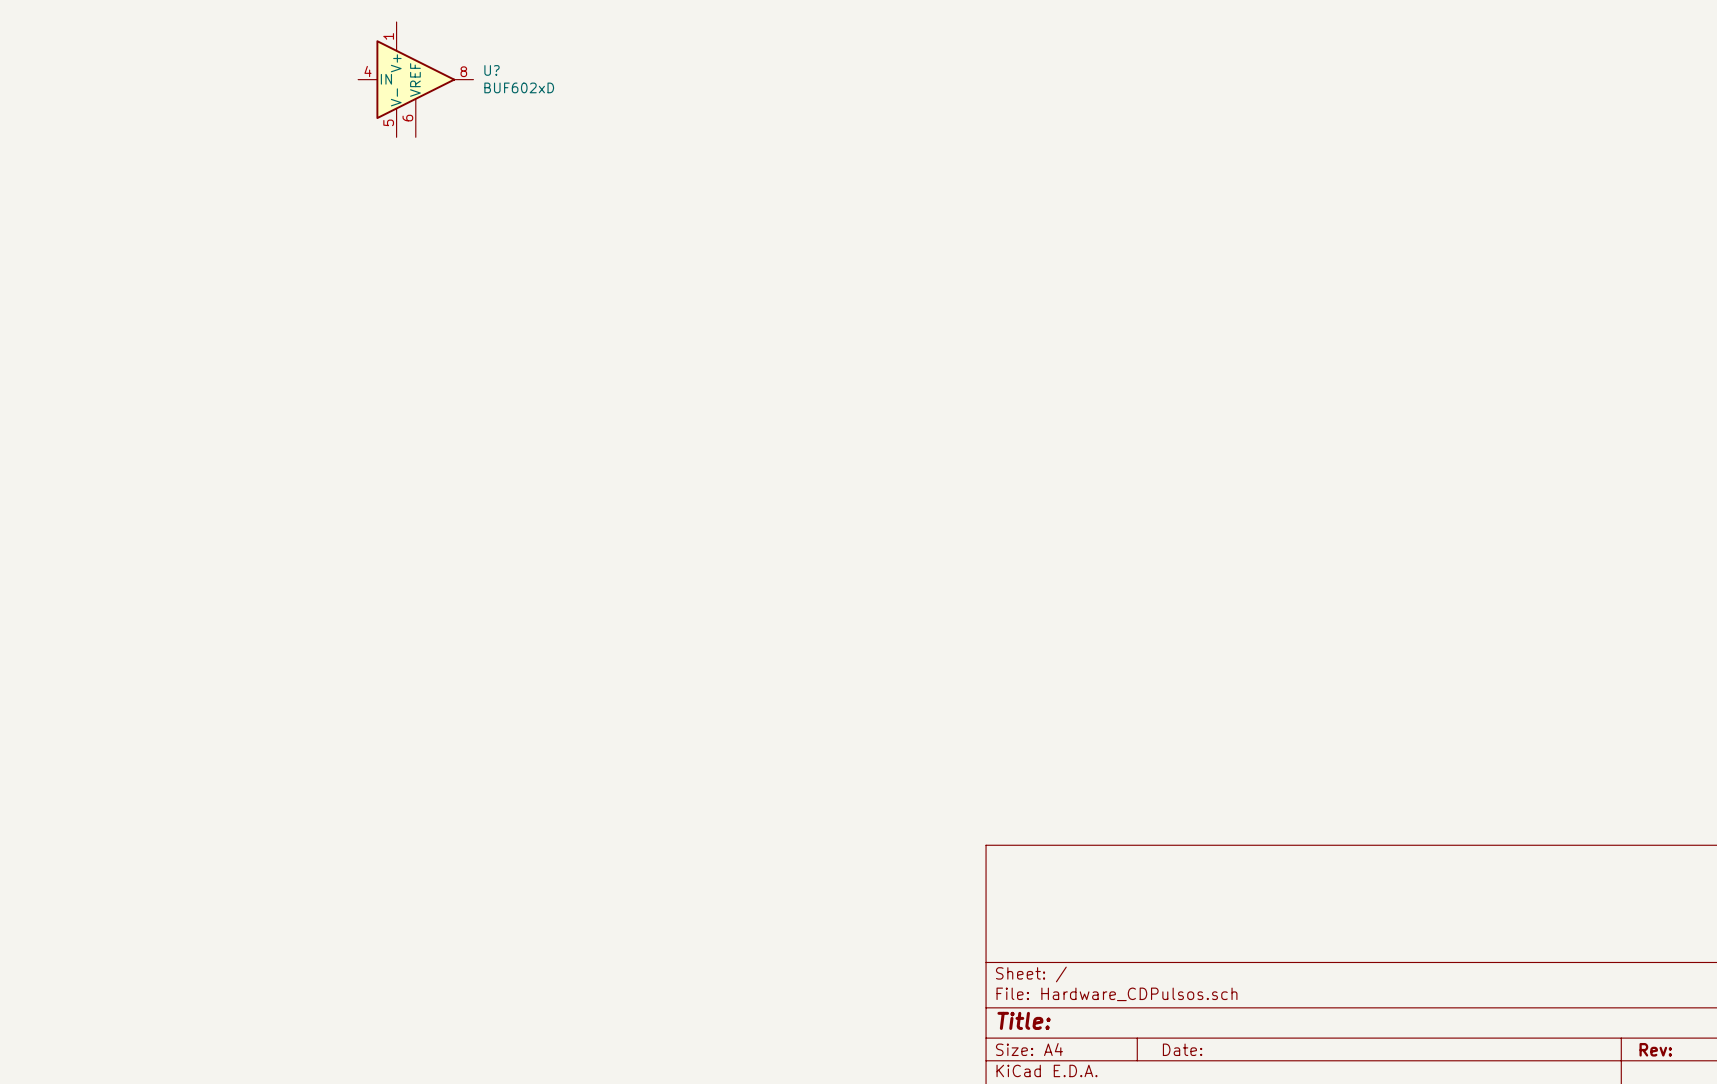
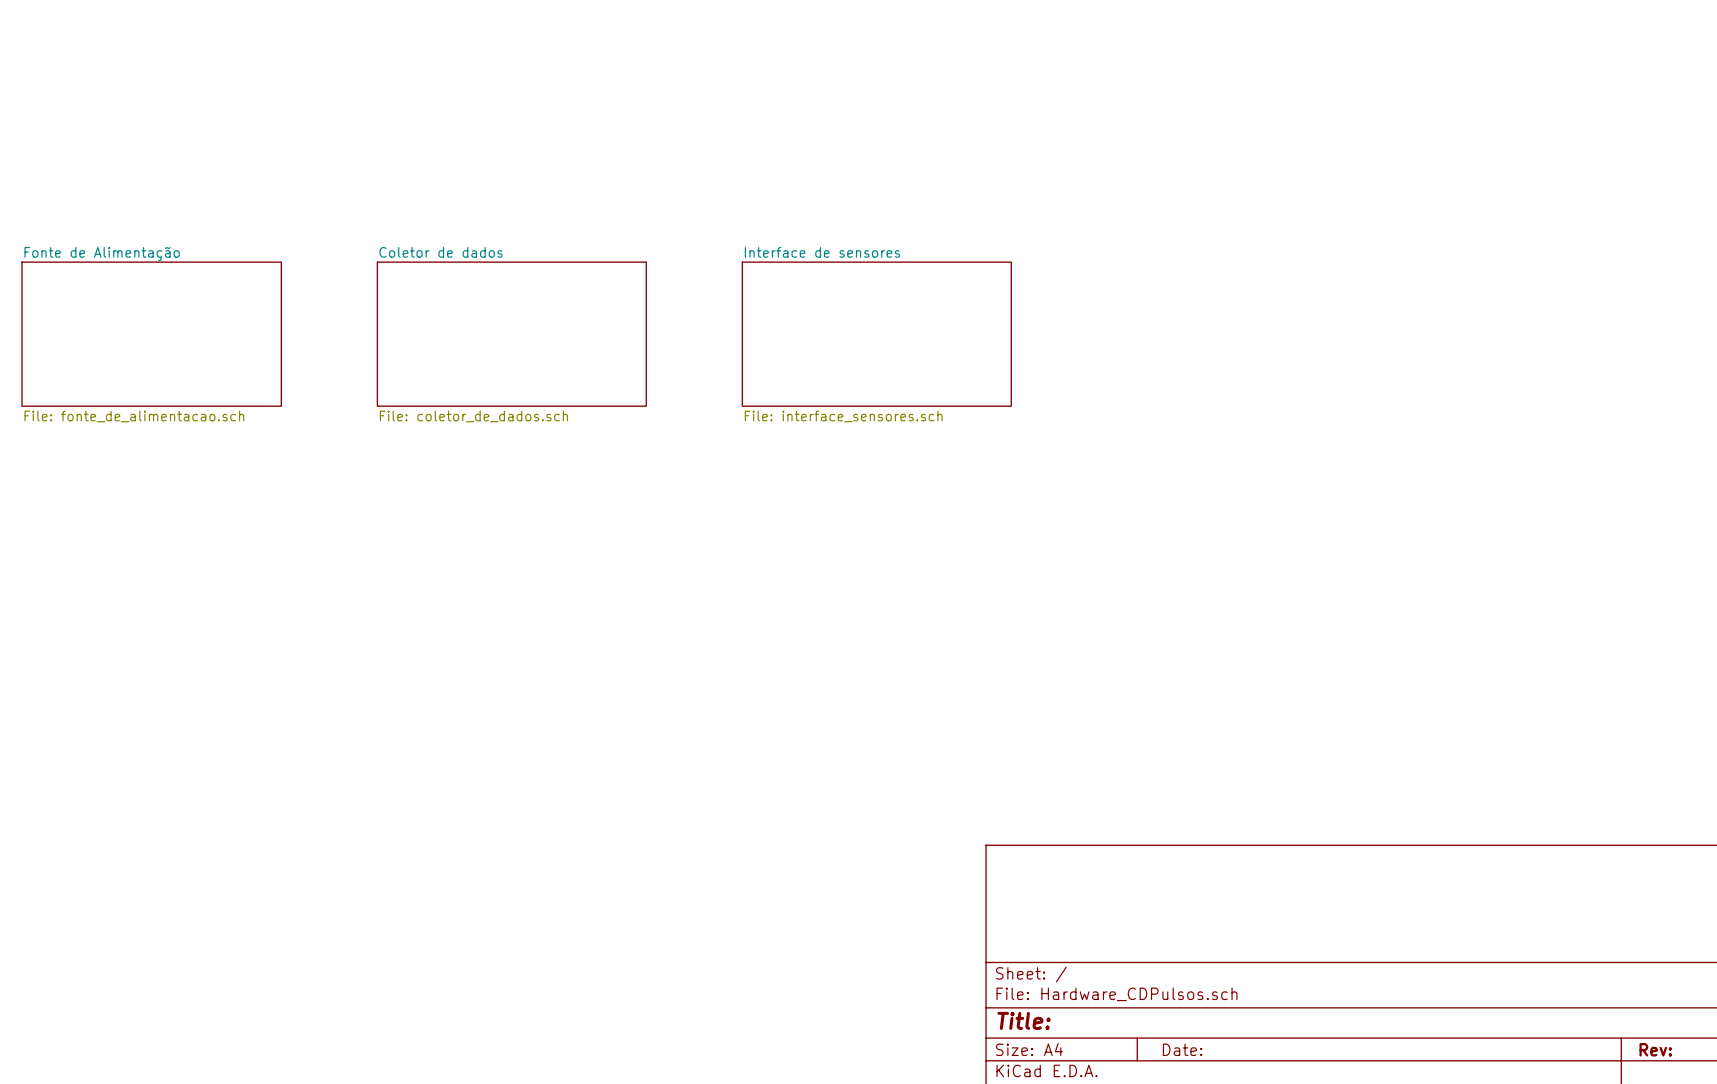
U?: BUF602xD (415, 79) -> none
sheet Fonte de Alimentação: none -> File: fonte_de_alimentacao.sch (151, 334)
sheet Coletor de dados: none -> File: coletor_de_dados.sch (511, 334)
sheet Interface de sensores: none -> File: interface_sensores.sch (876, 334)

